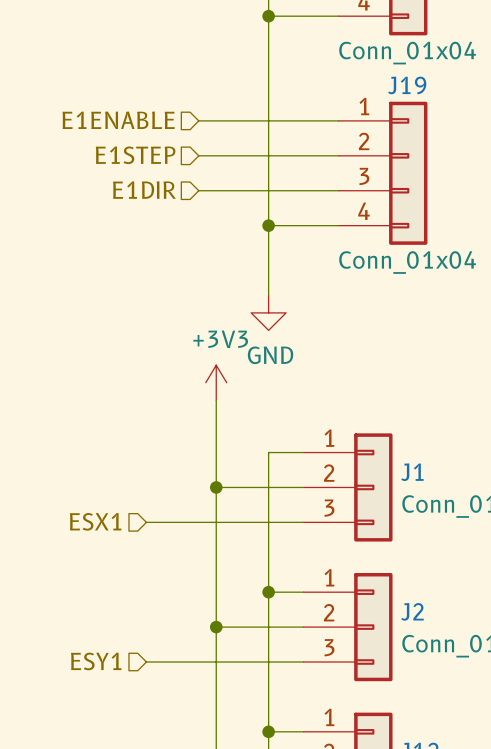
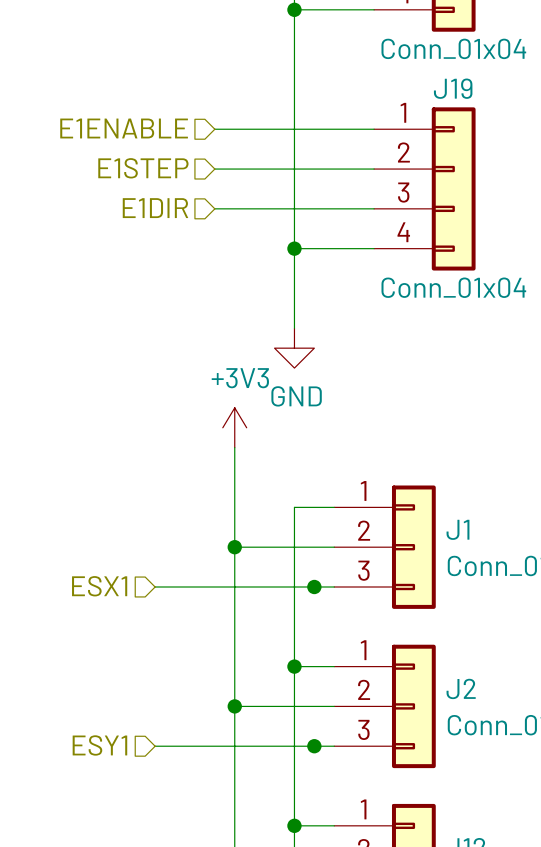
junction: none -> (314, 587)
junction: none -> (314, 746)

